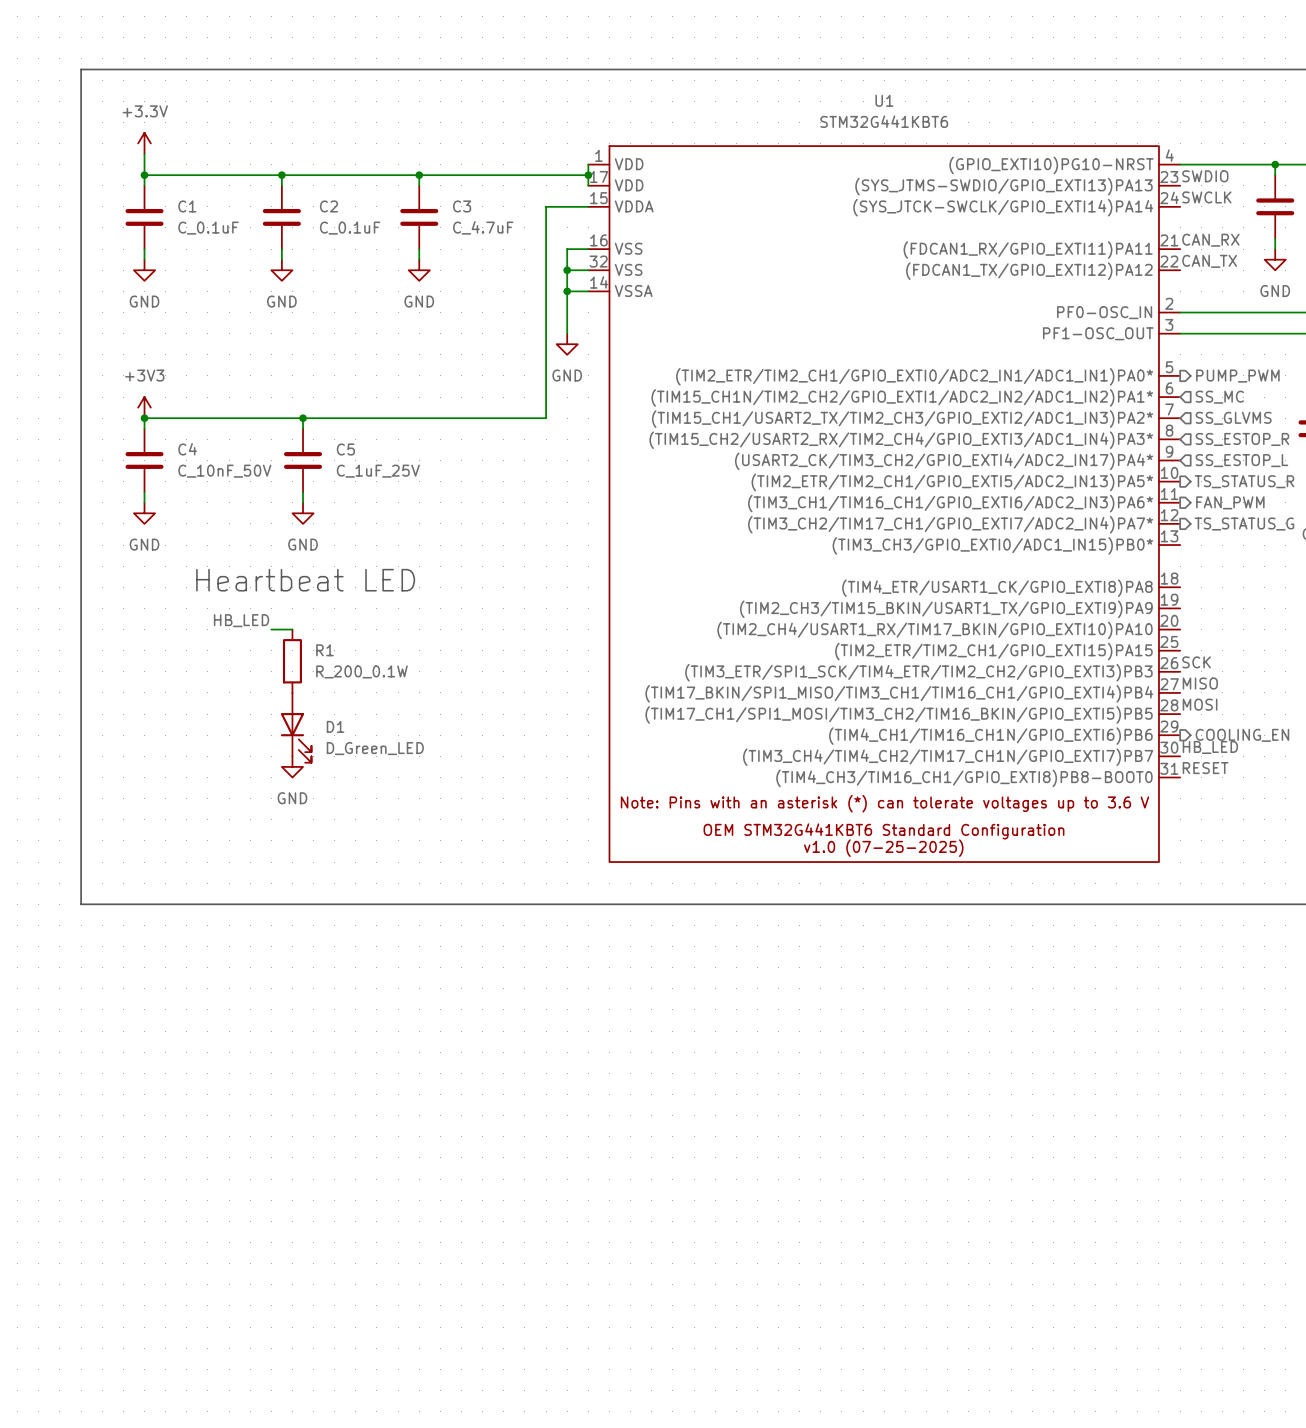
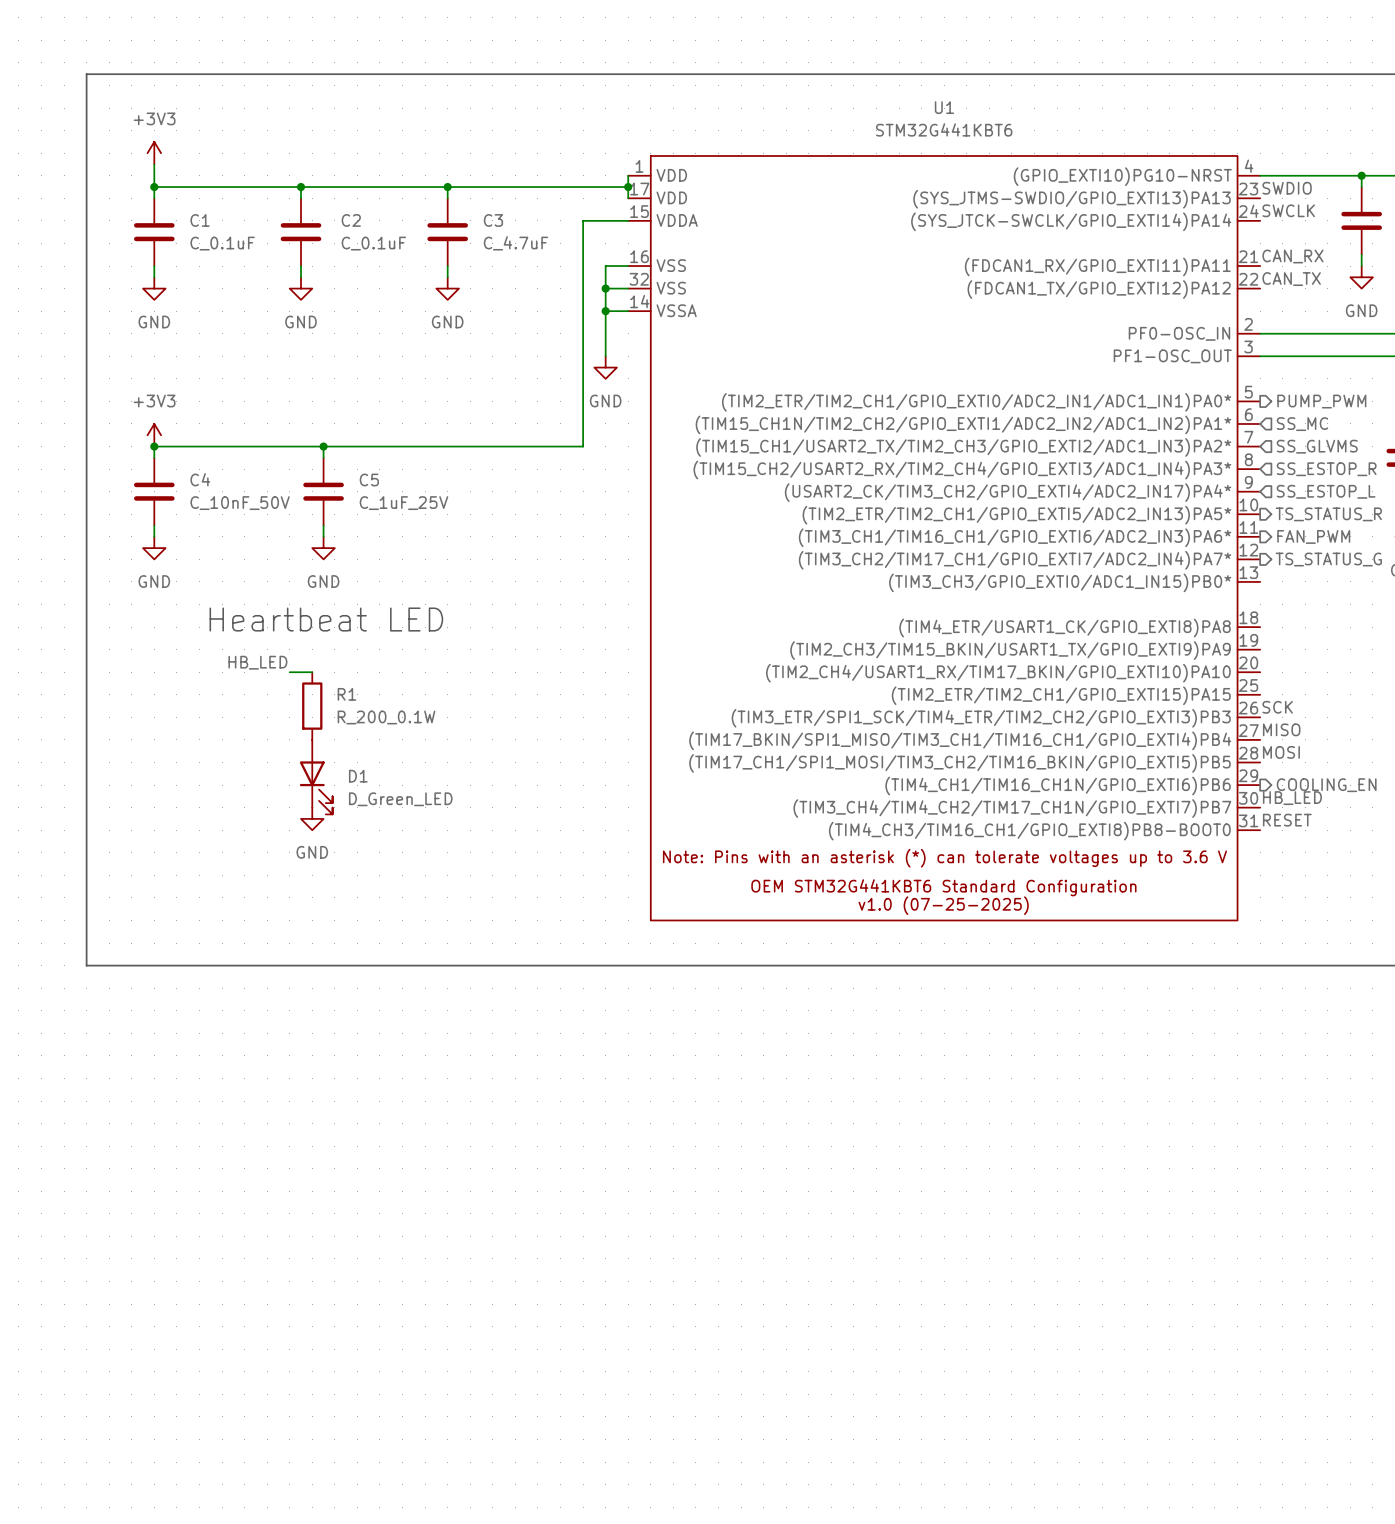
power symbol: +3.3V (144, 143) -> +3V3 (154, 153)

